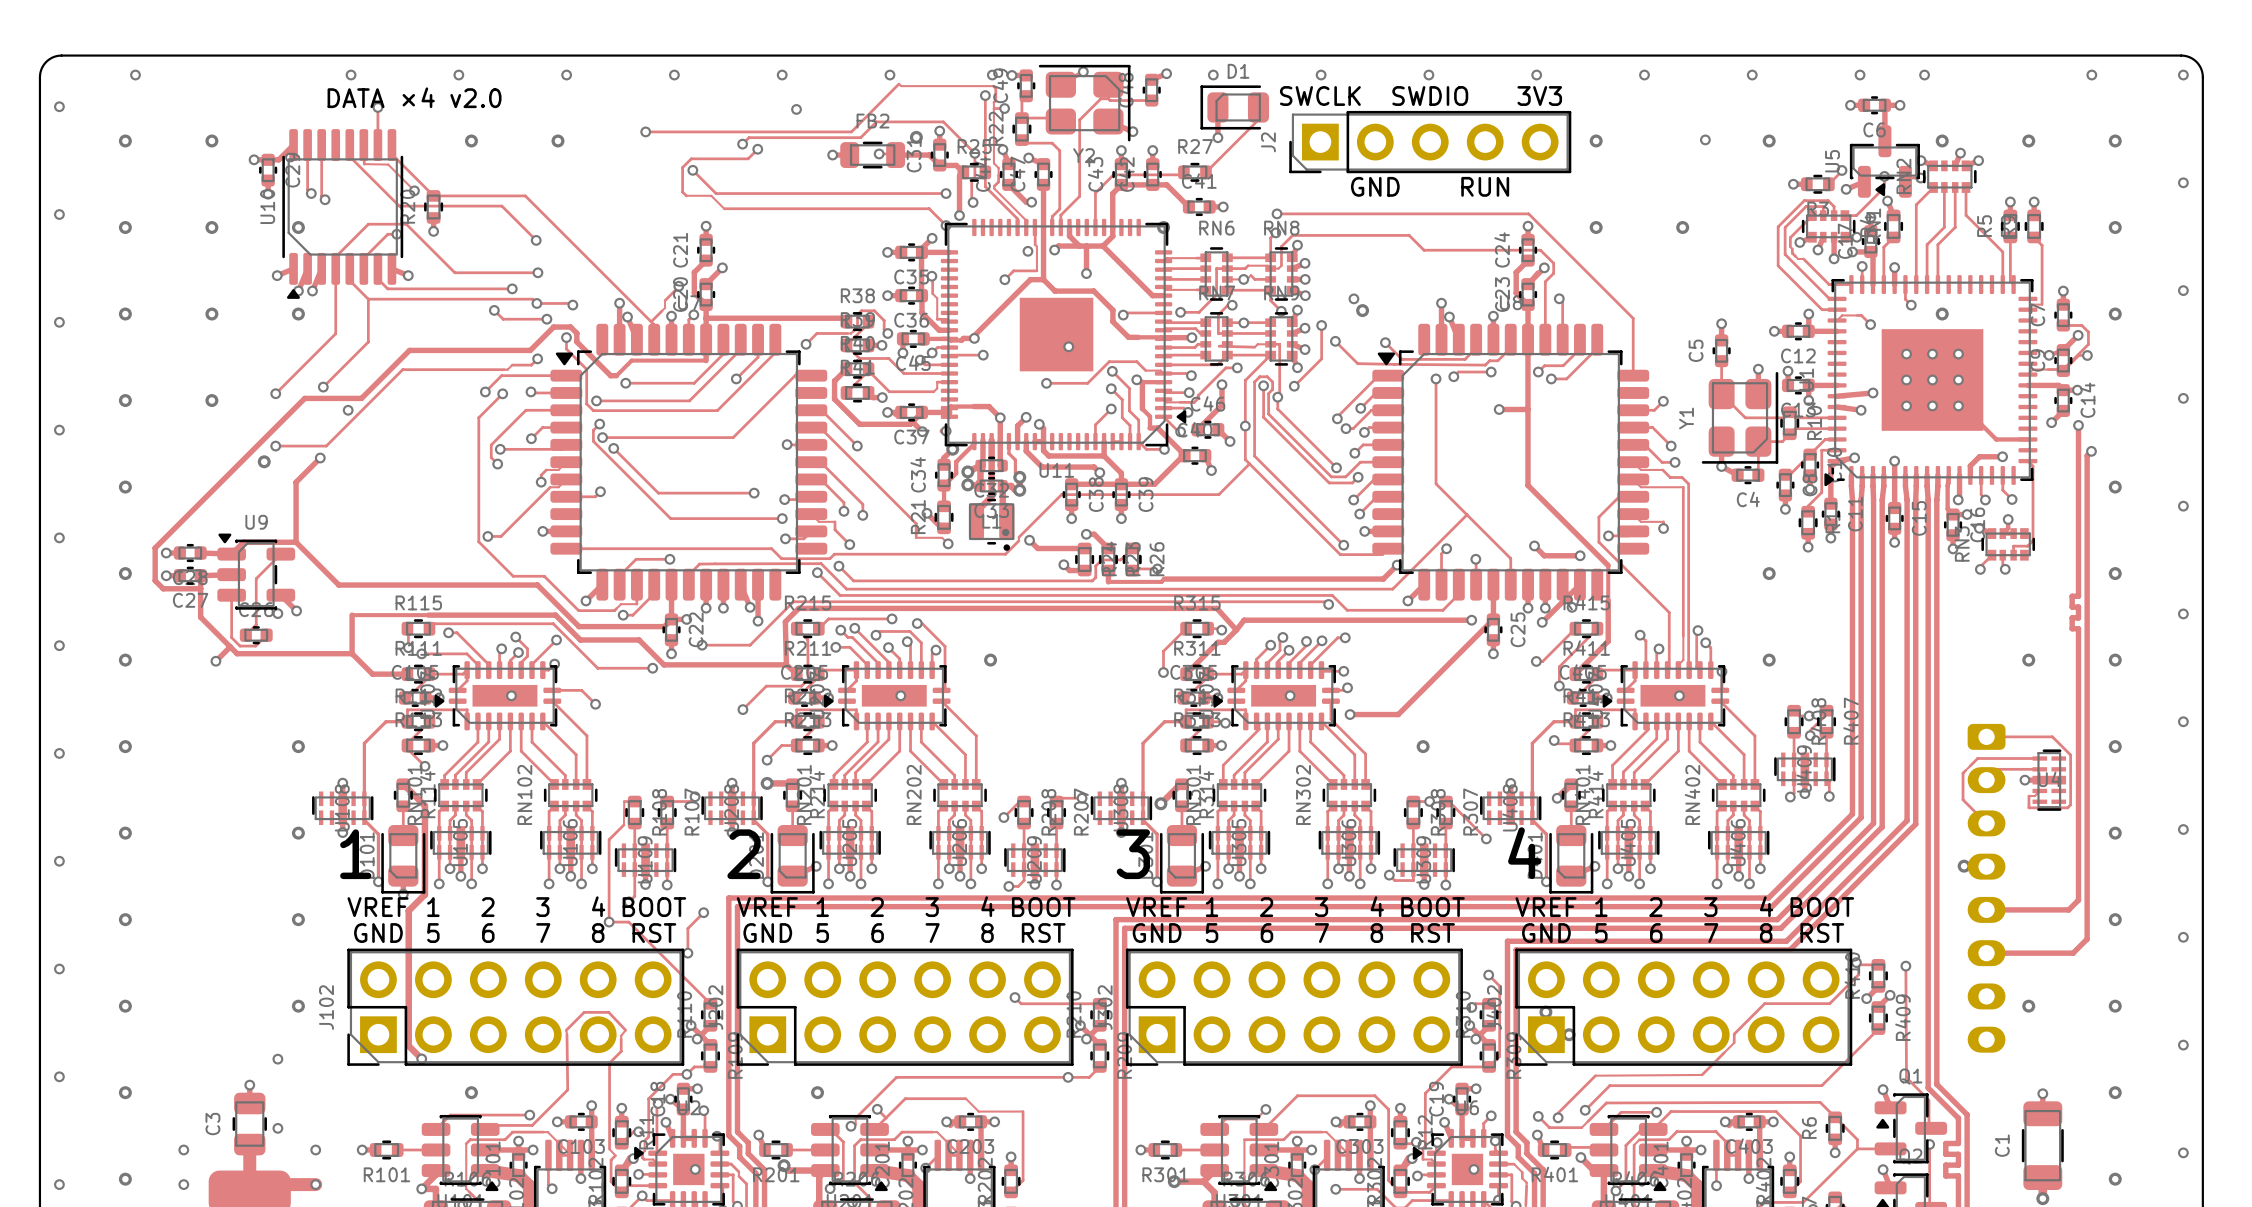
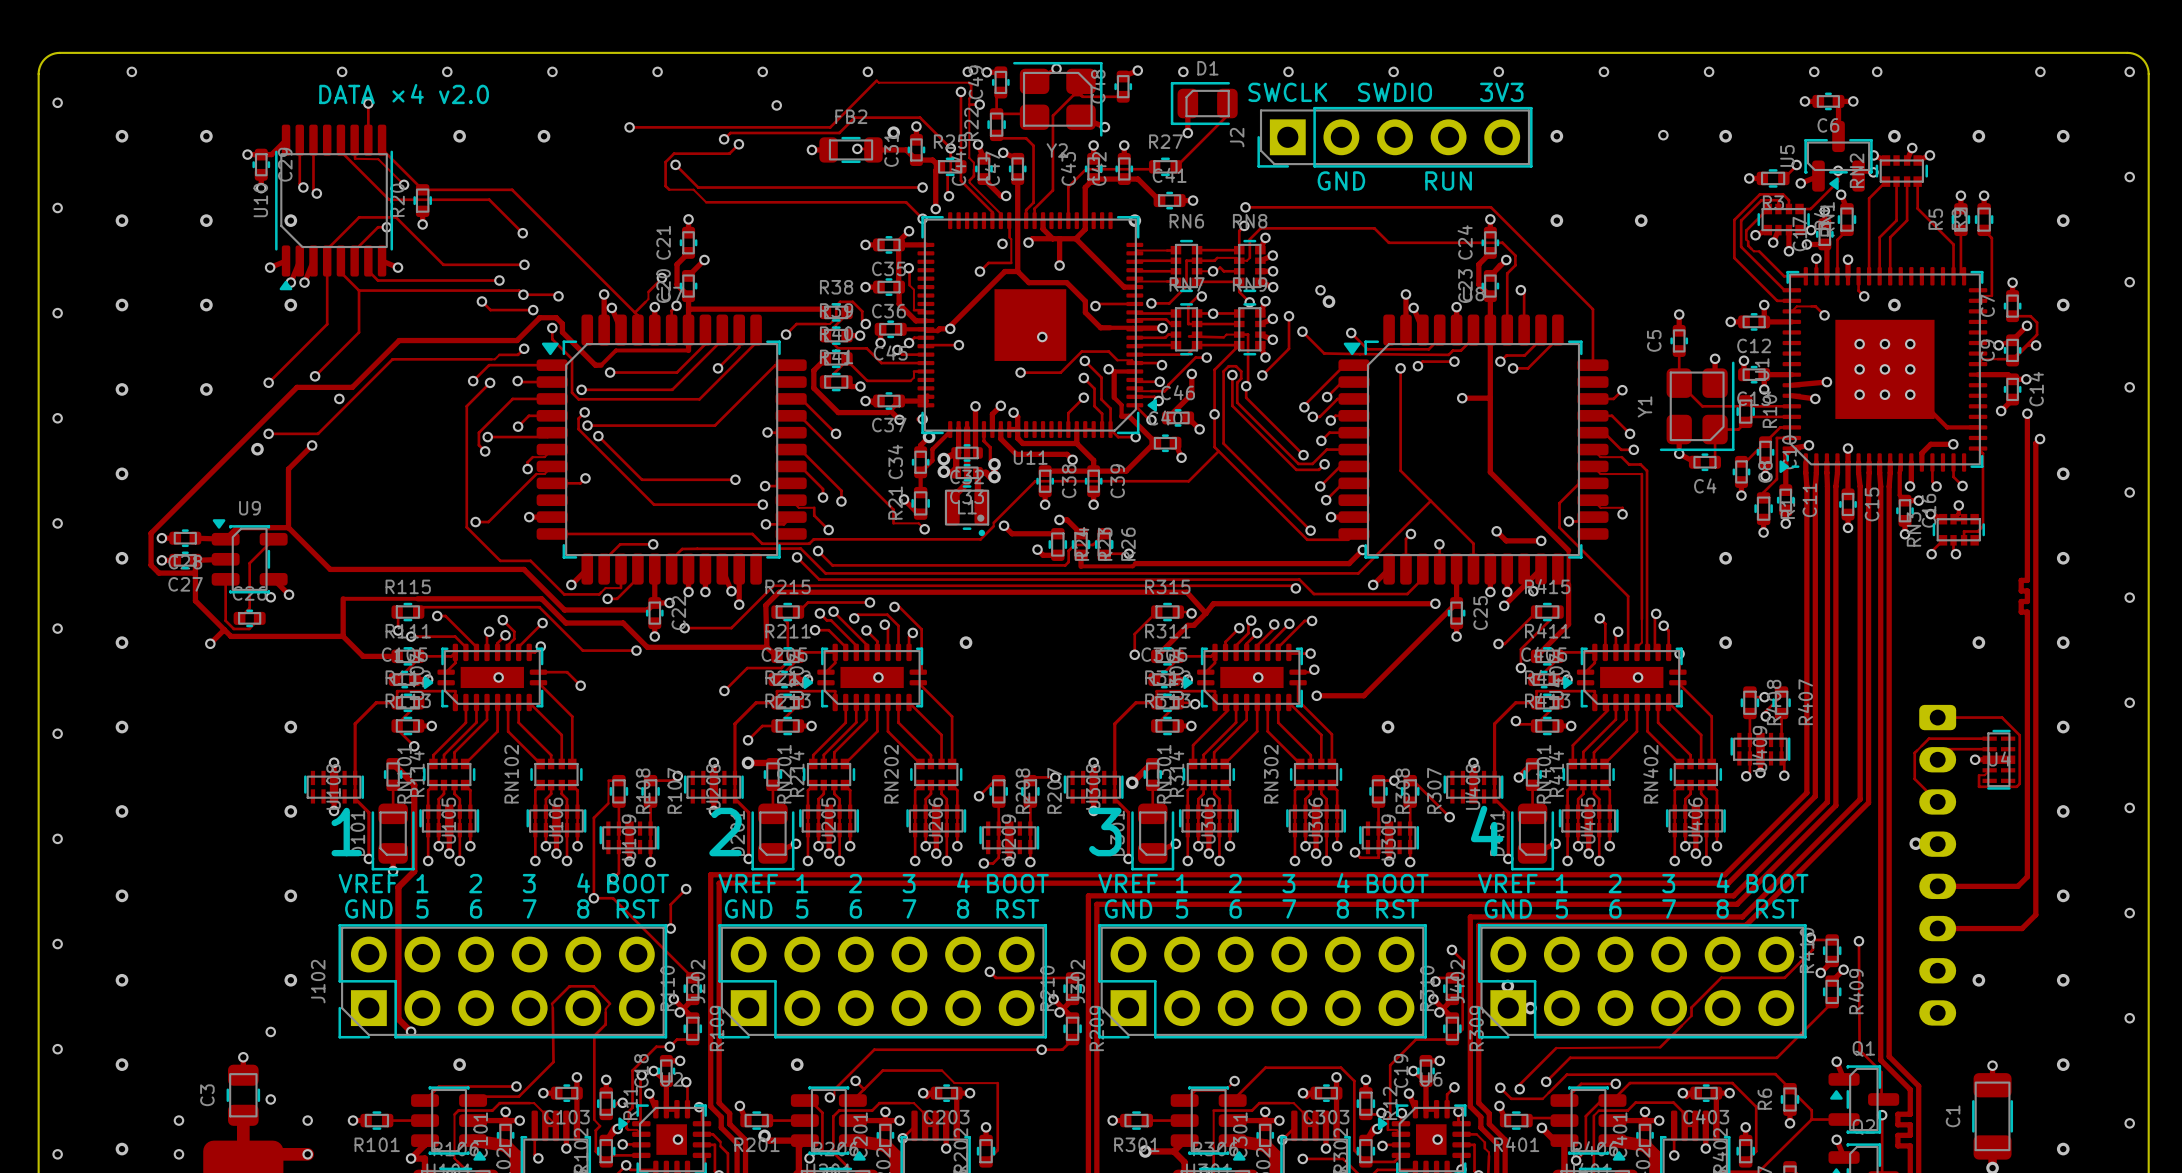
track: (951, 406) (988, 406) (1000, 417) -> none

